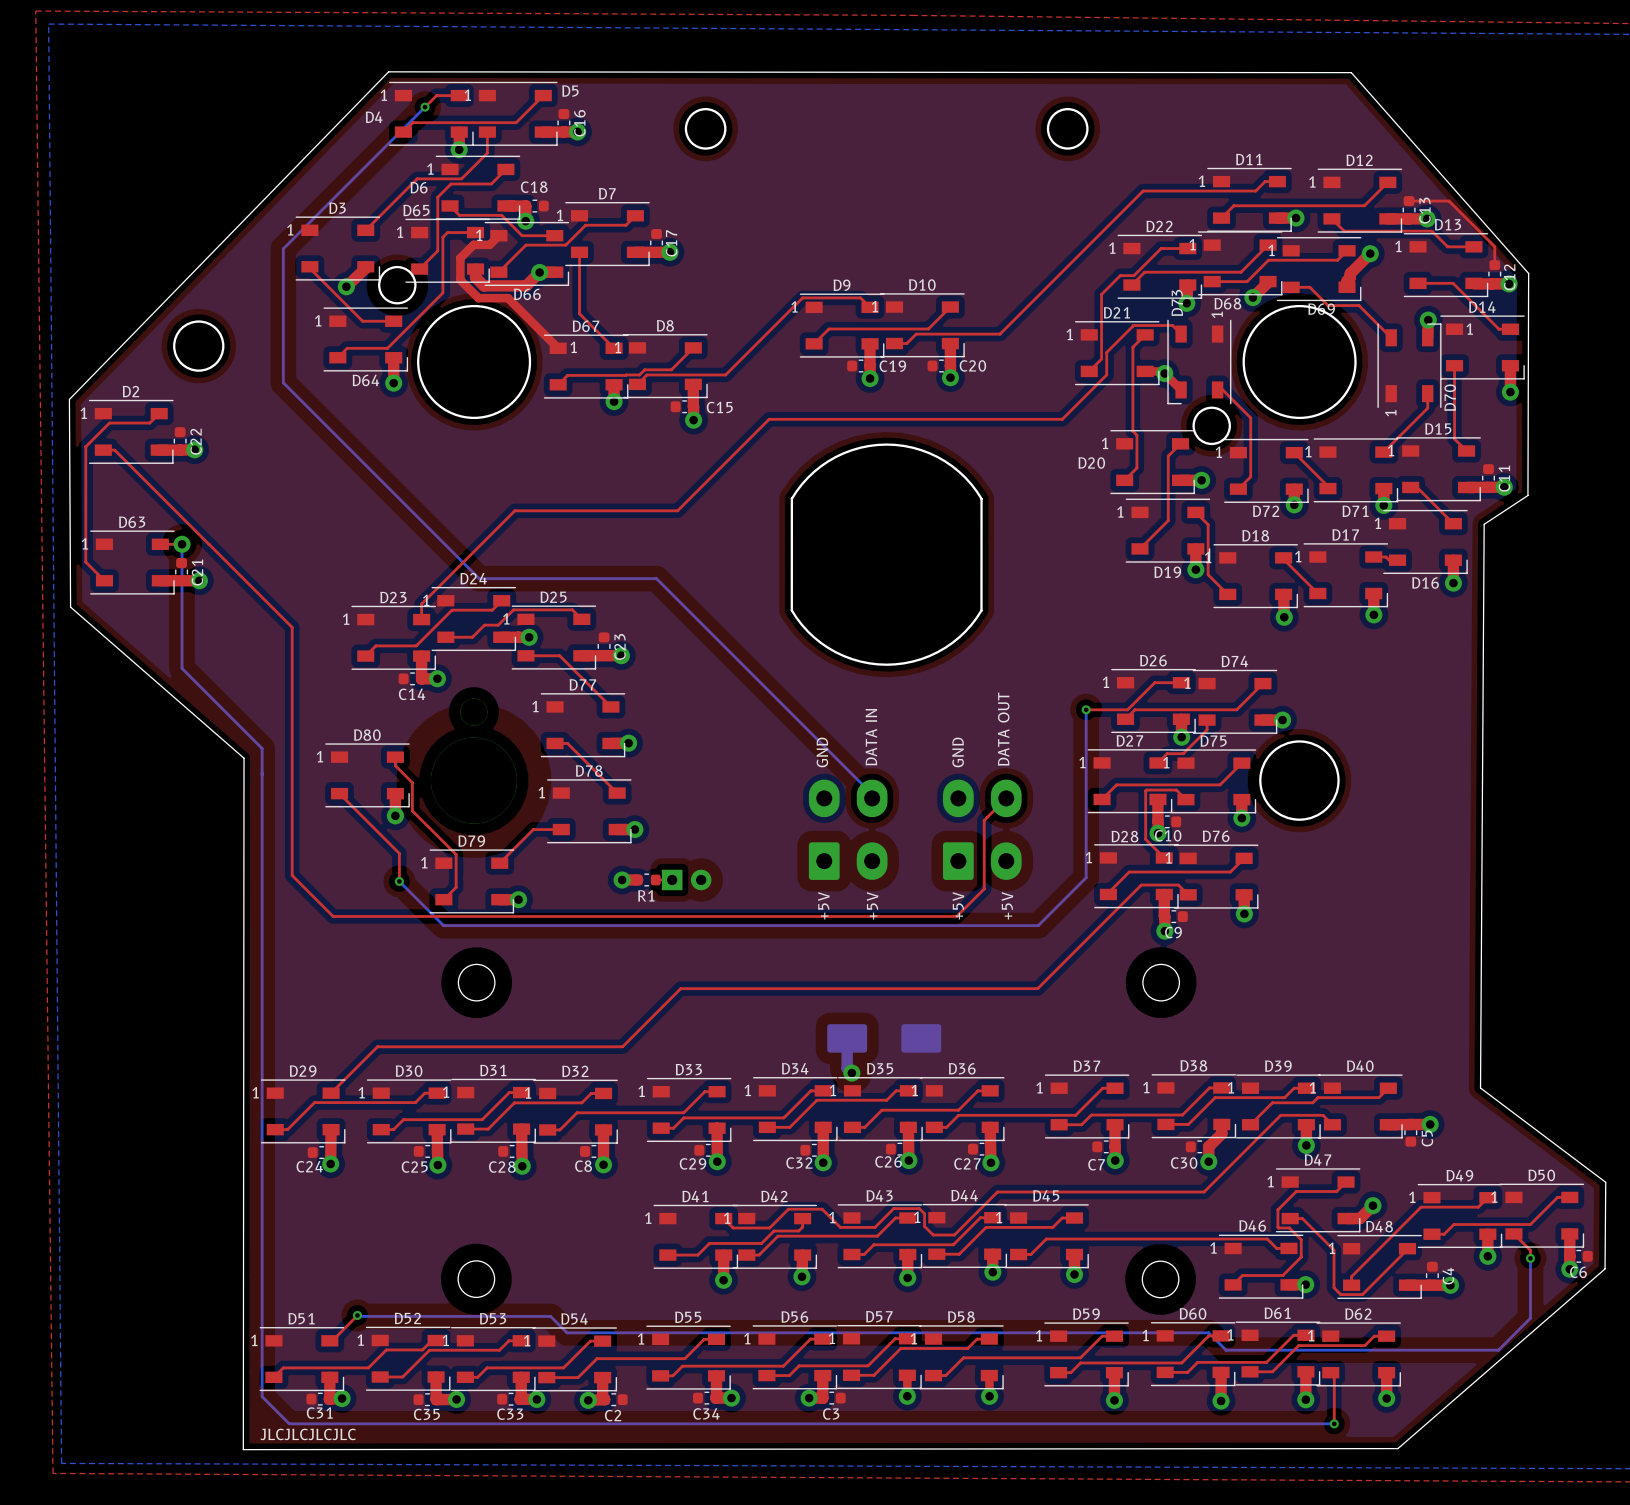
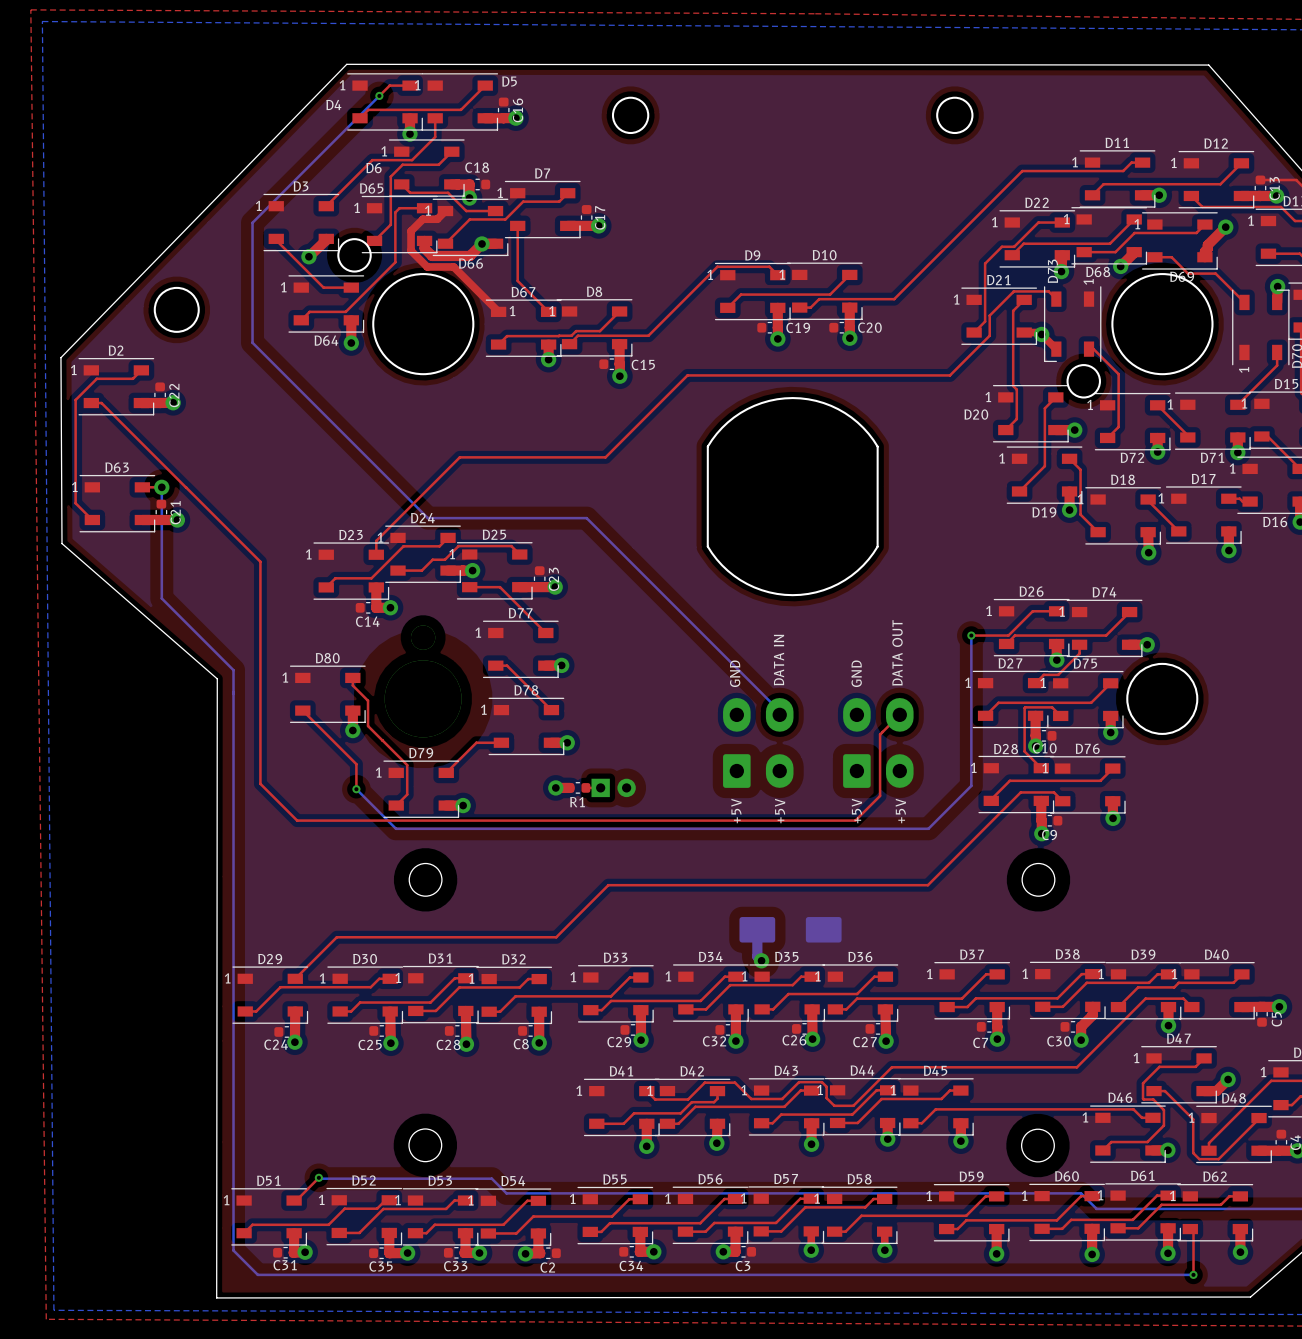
text: JLCJLCJLCJLC (308, 1434) -> none

